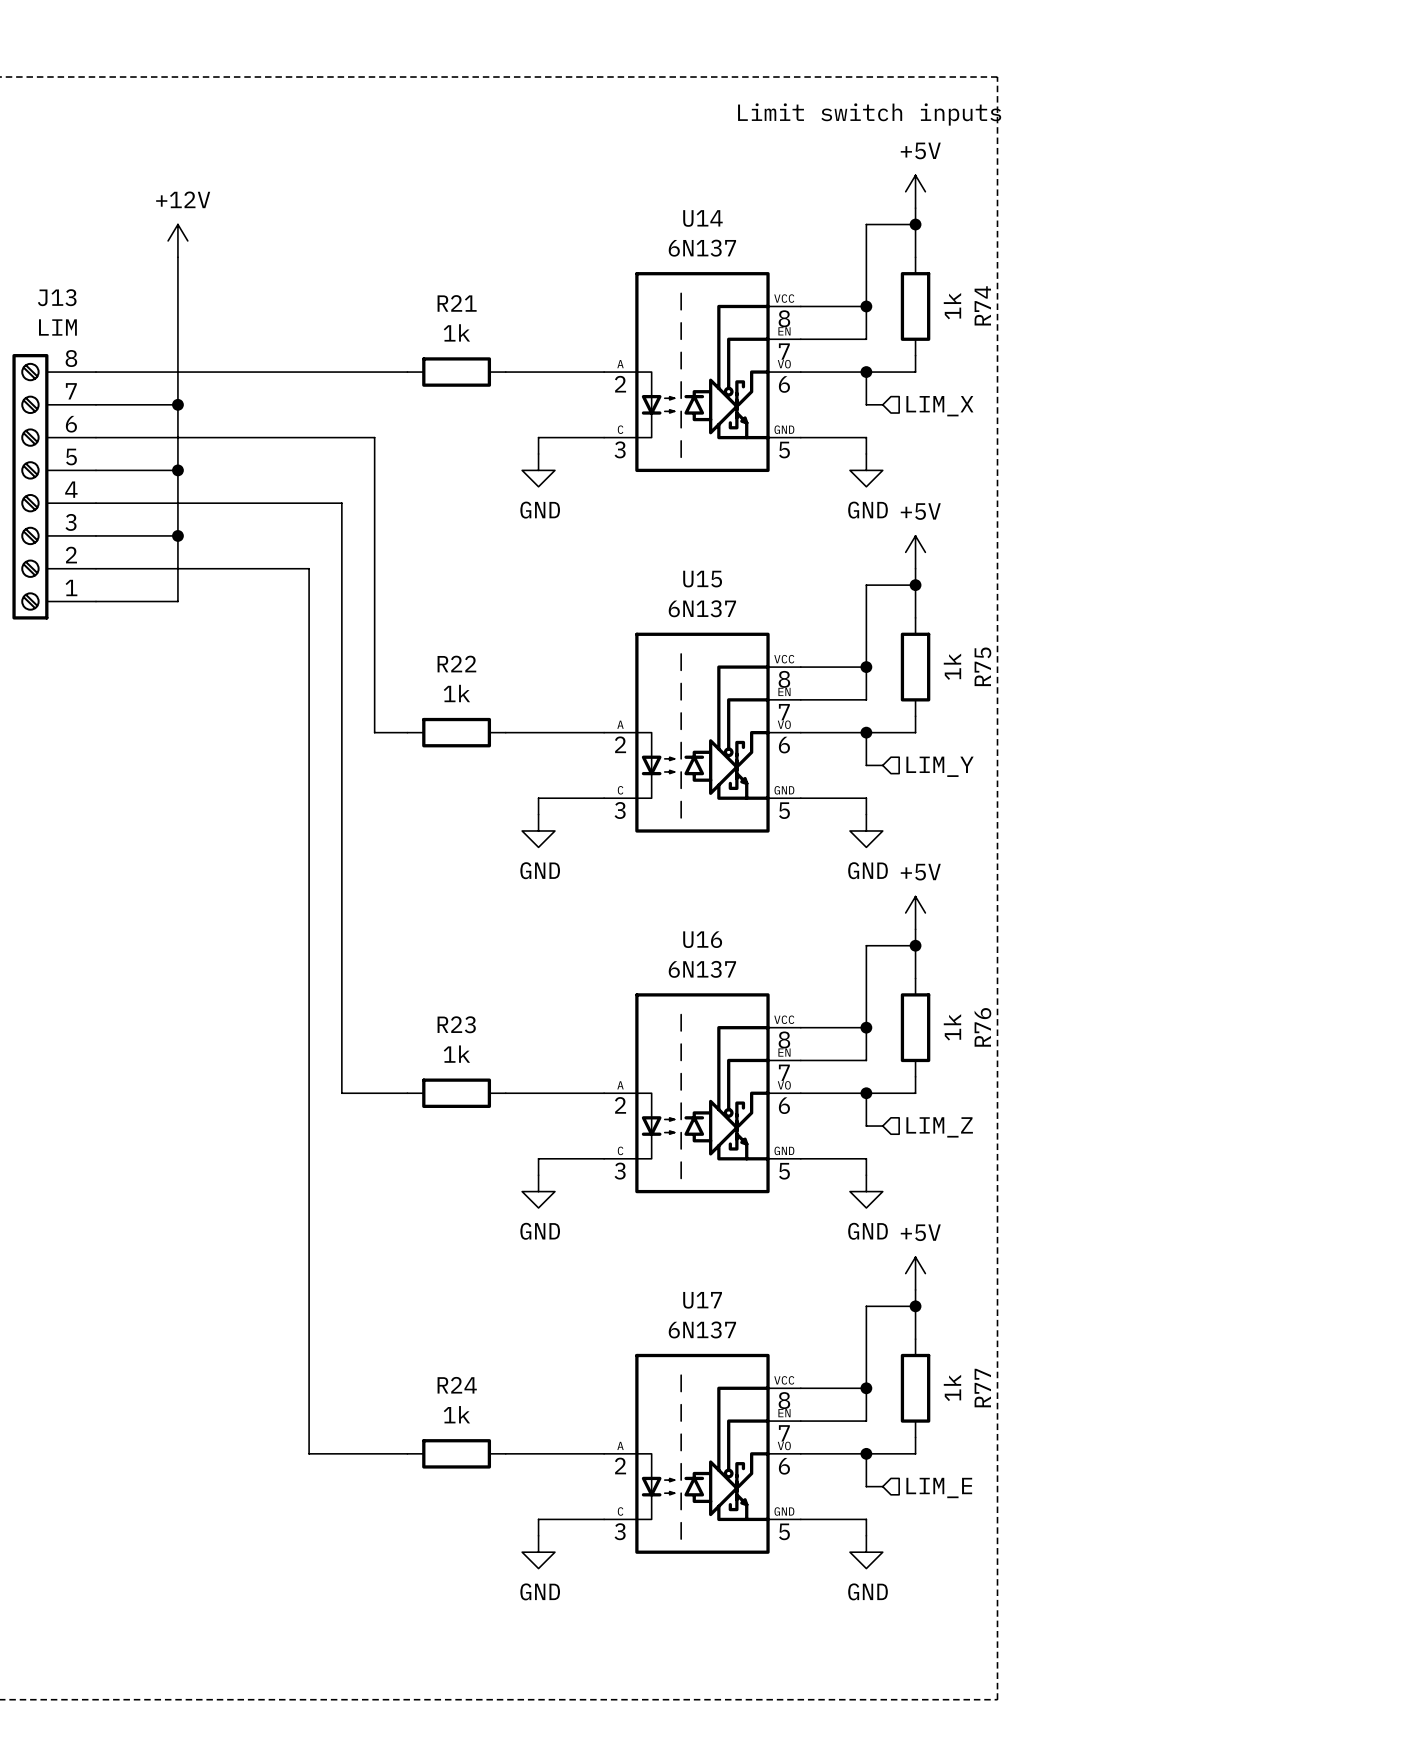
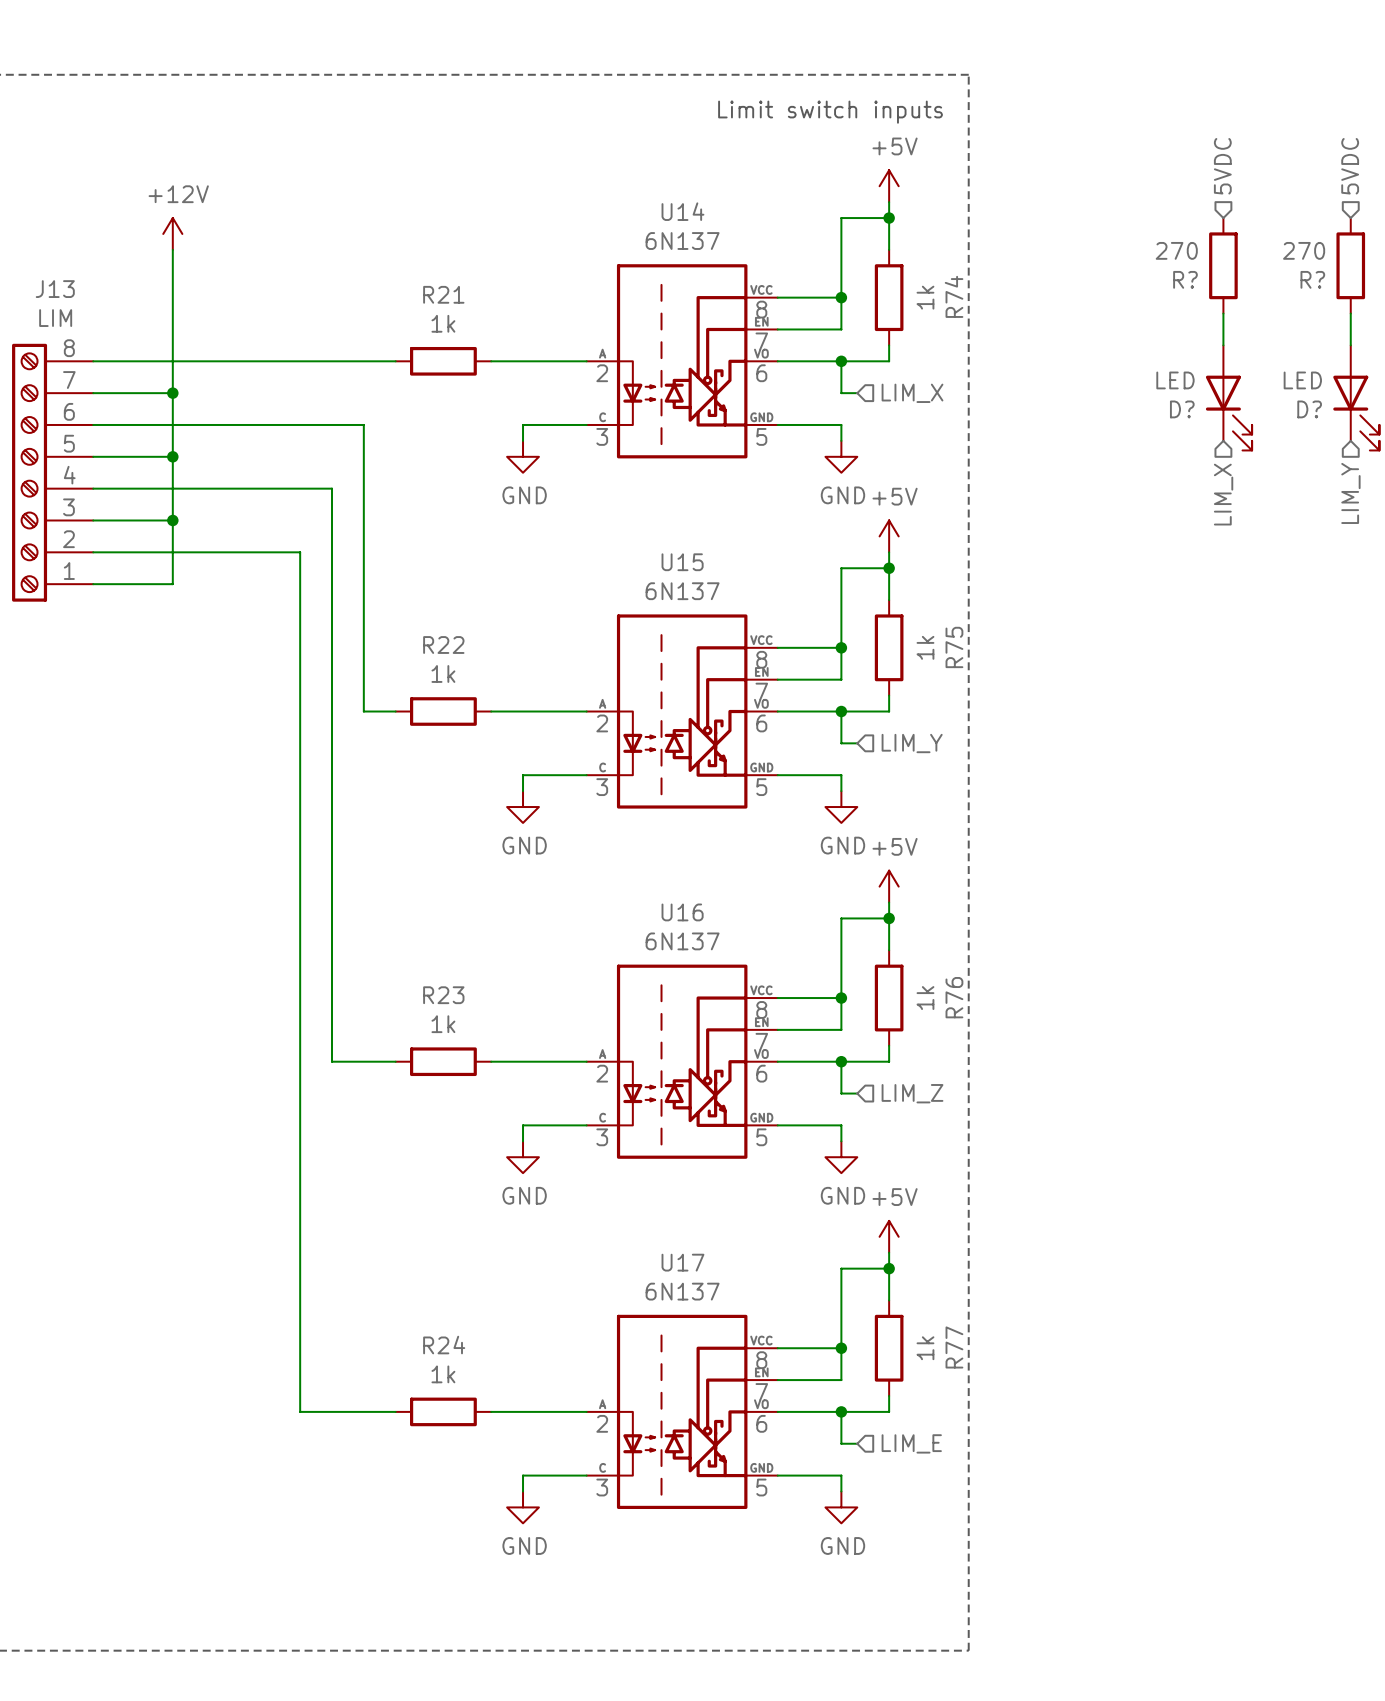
hierarchical label: none -> 5VDC (1222, 166)
hierarchical label: none -> 5VDC (1350, 166)
R?: none -> 270 (1223, 265)
R?: none -> 270 (1350, 265)
wire: none -> (1223, 313) (1223, 345)
wire: none -> (1350, 313) (1350, 345)
D?: none -> LED (1228, 397)
D?: none -> LED (1356, 397)
hierarchical label: none -> LIM_X (1223, 494)
hierarchical label: none -> LIM_Y (1350, 493)

